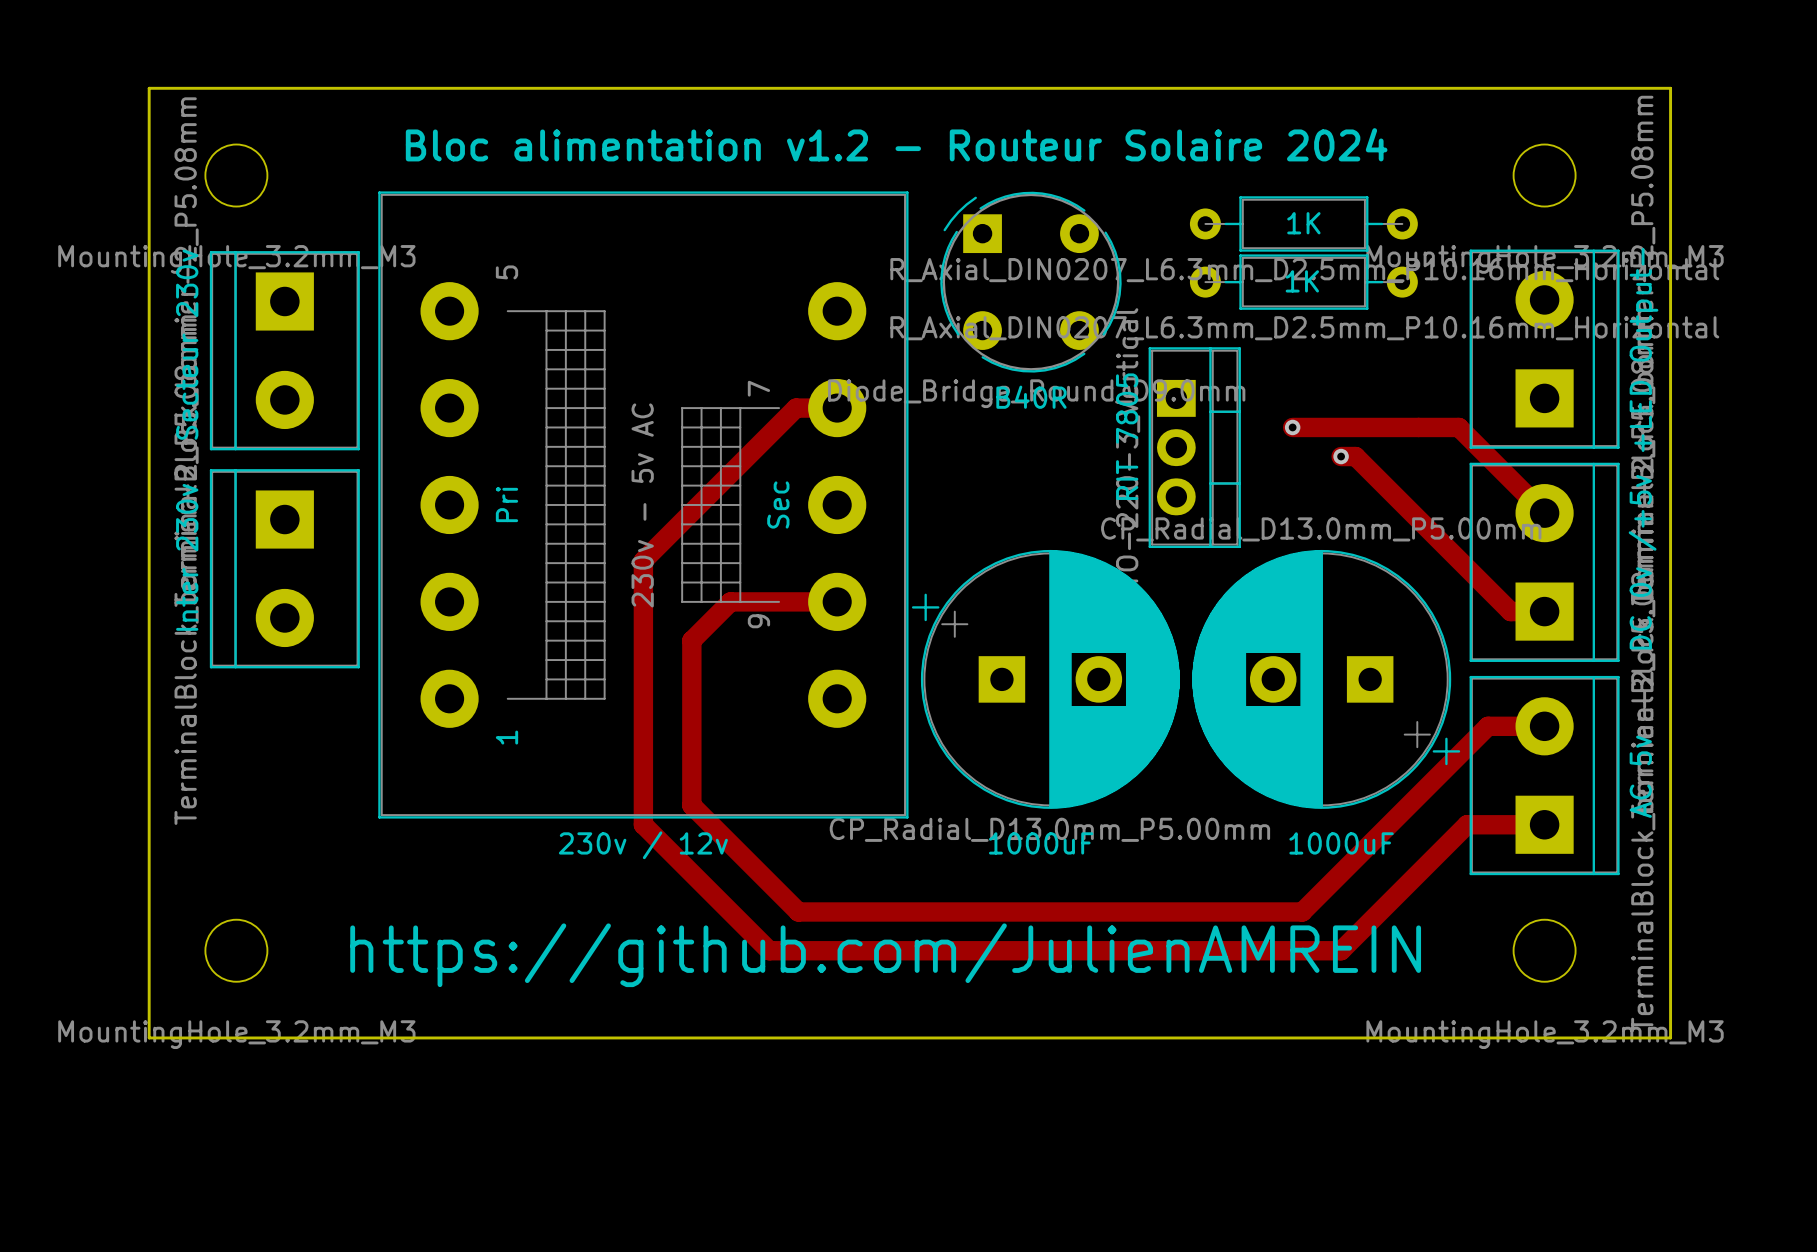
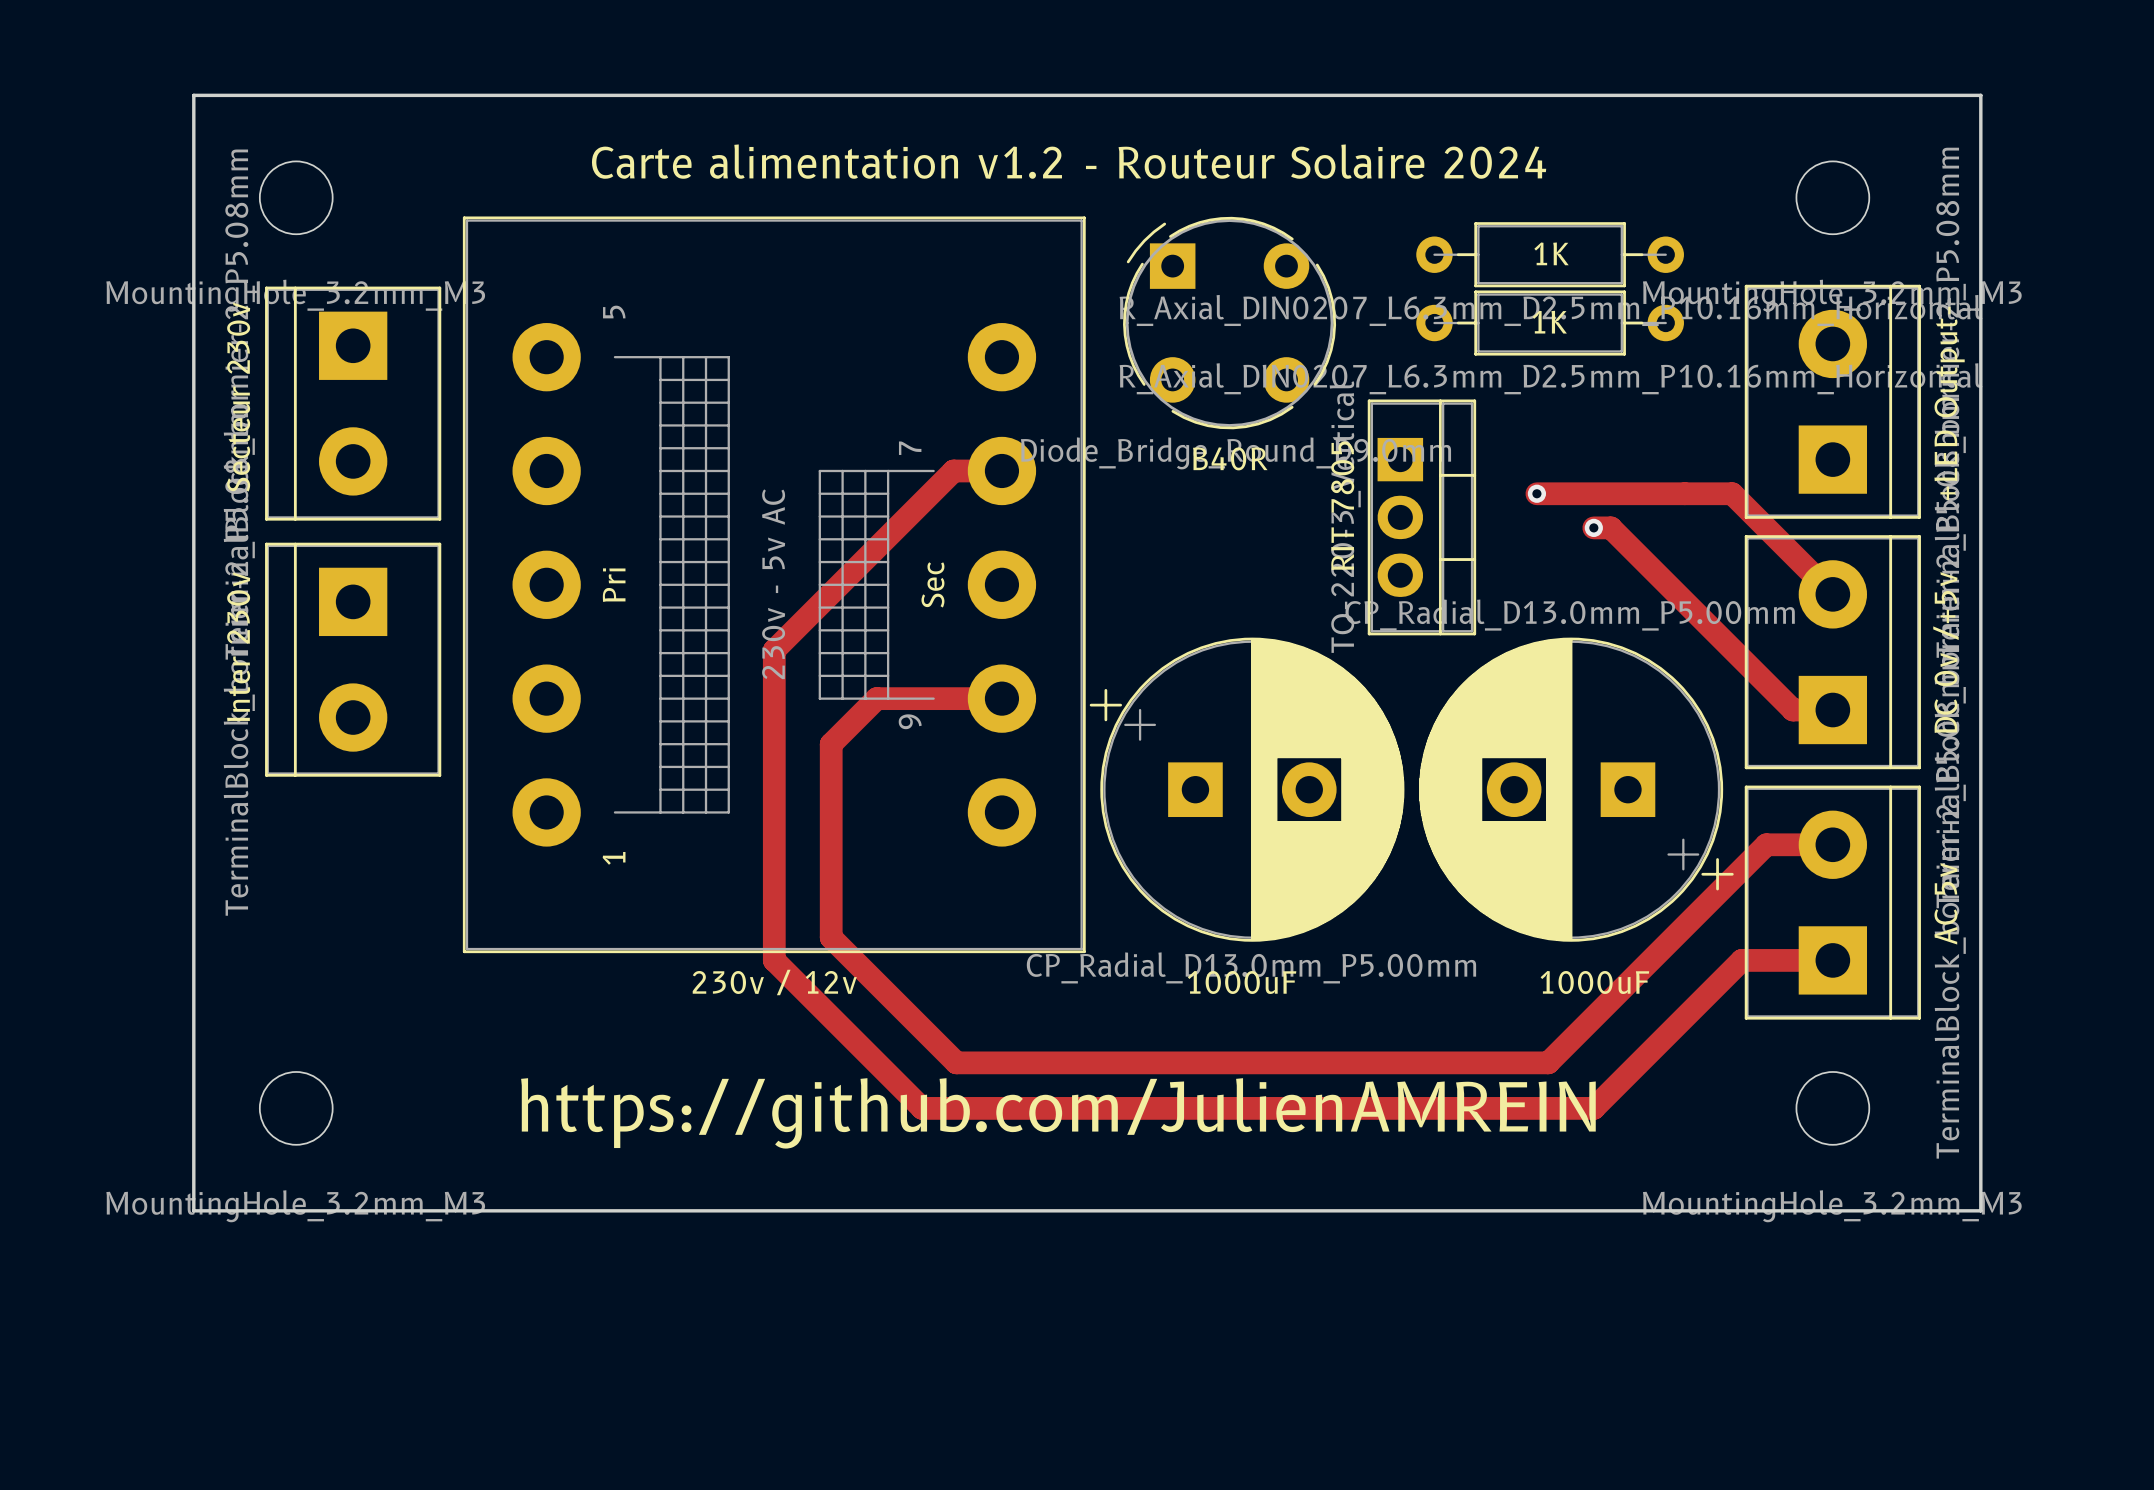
text: Bloc alimentation v1.2 - Routeur Solaire 2024 (896, 144) -> Carte alimentation v1.2 - Routeur Solaire 2024 (1069, 161)

